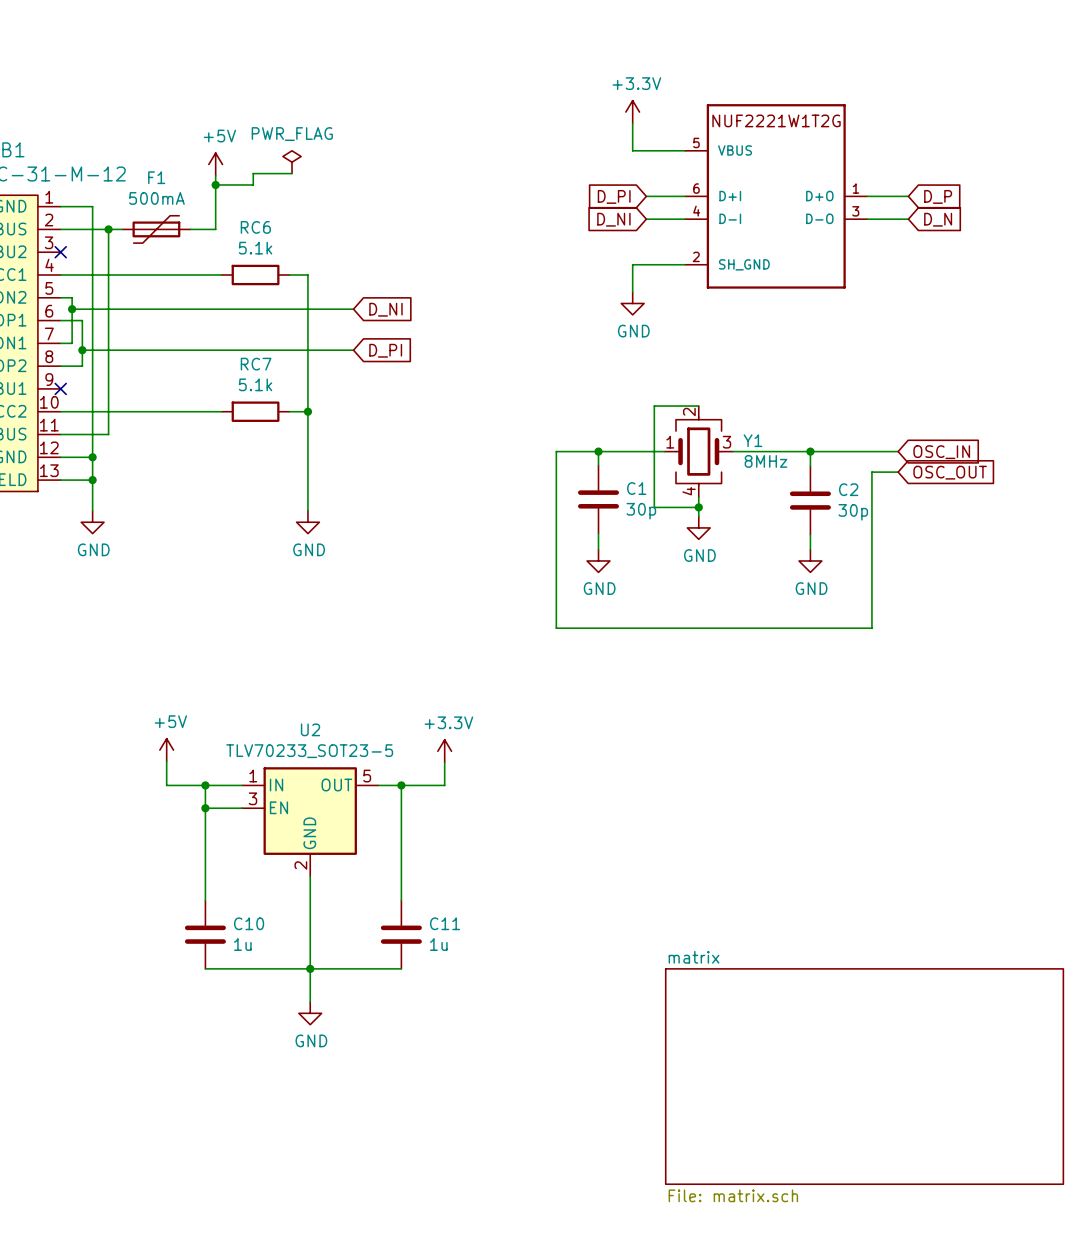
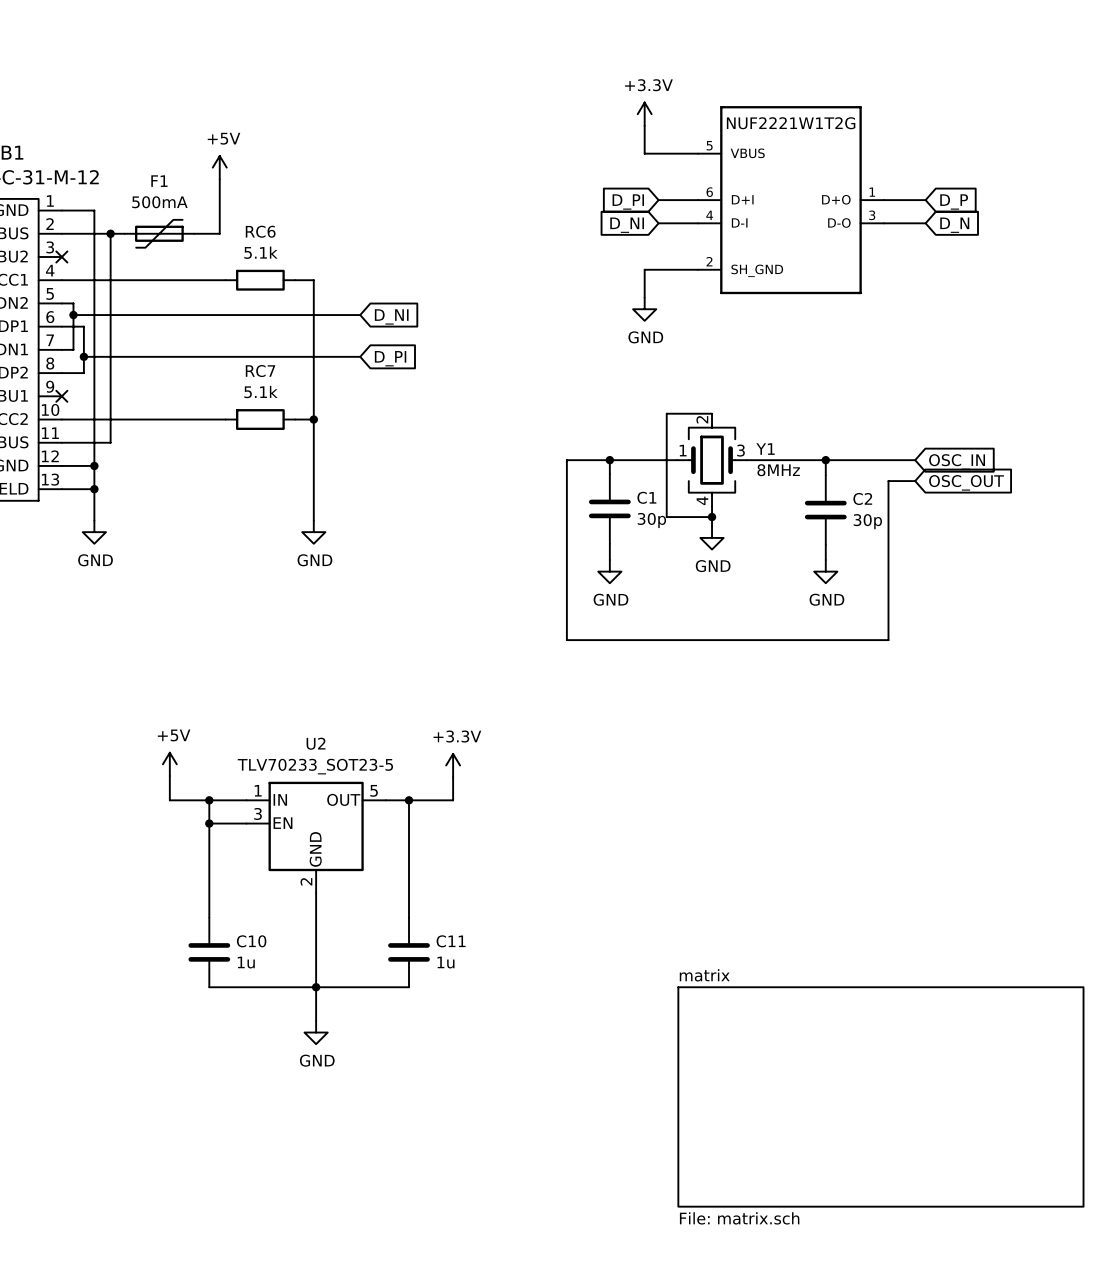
power symbol: PWR_FLAG (292, 162) -> none
wire: (292, 173) (253, 173) (253, 184) (215, 184) -> none
junction: (215, 184) -> none

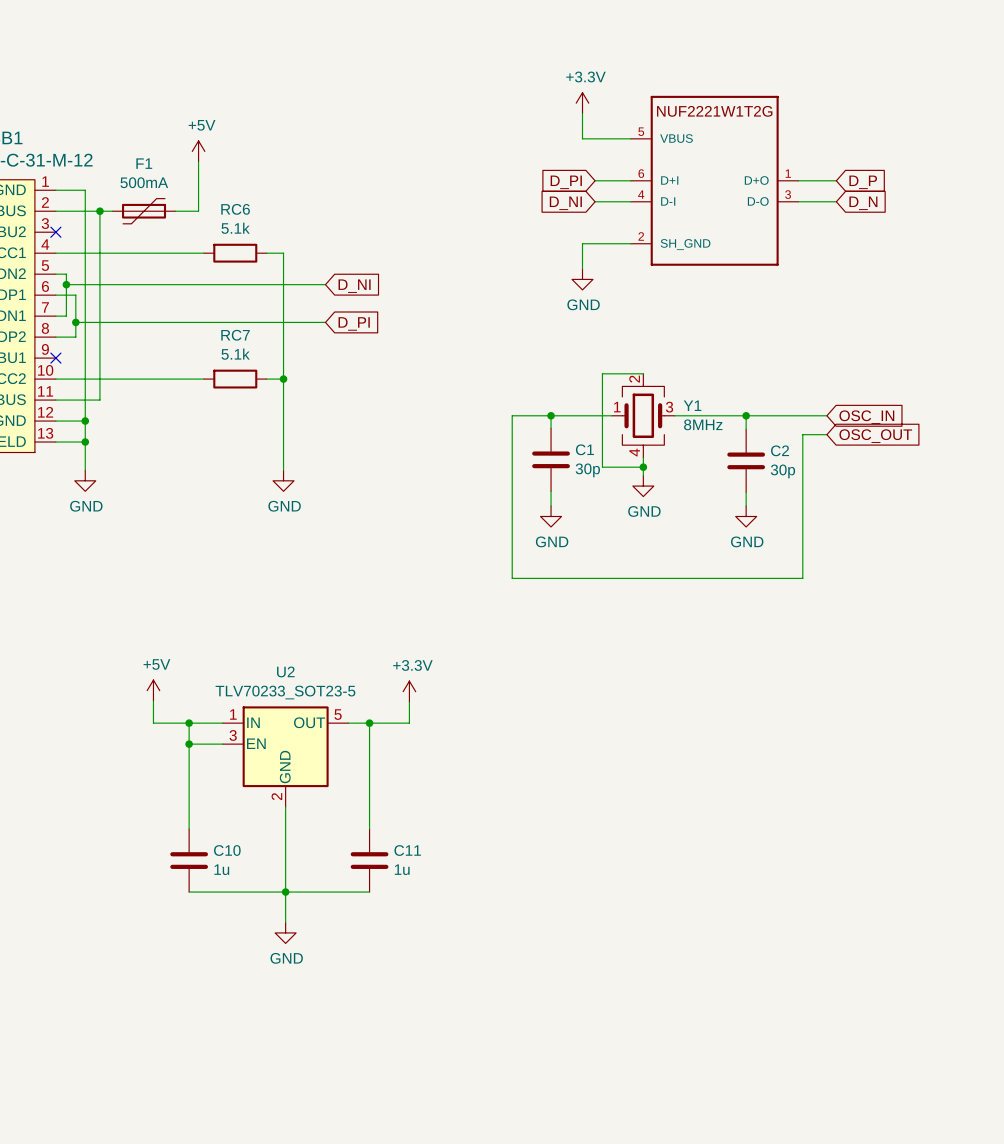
sheet matrix: File: matrix.sch (880, 1096) -> none

